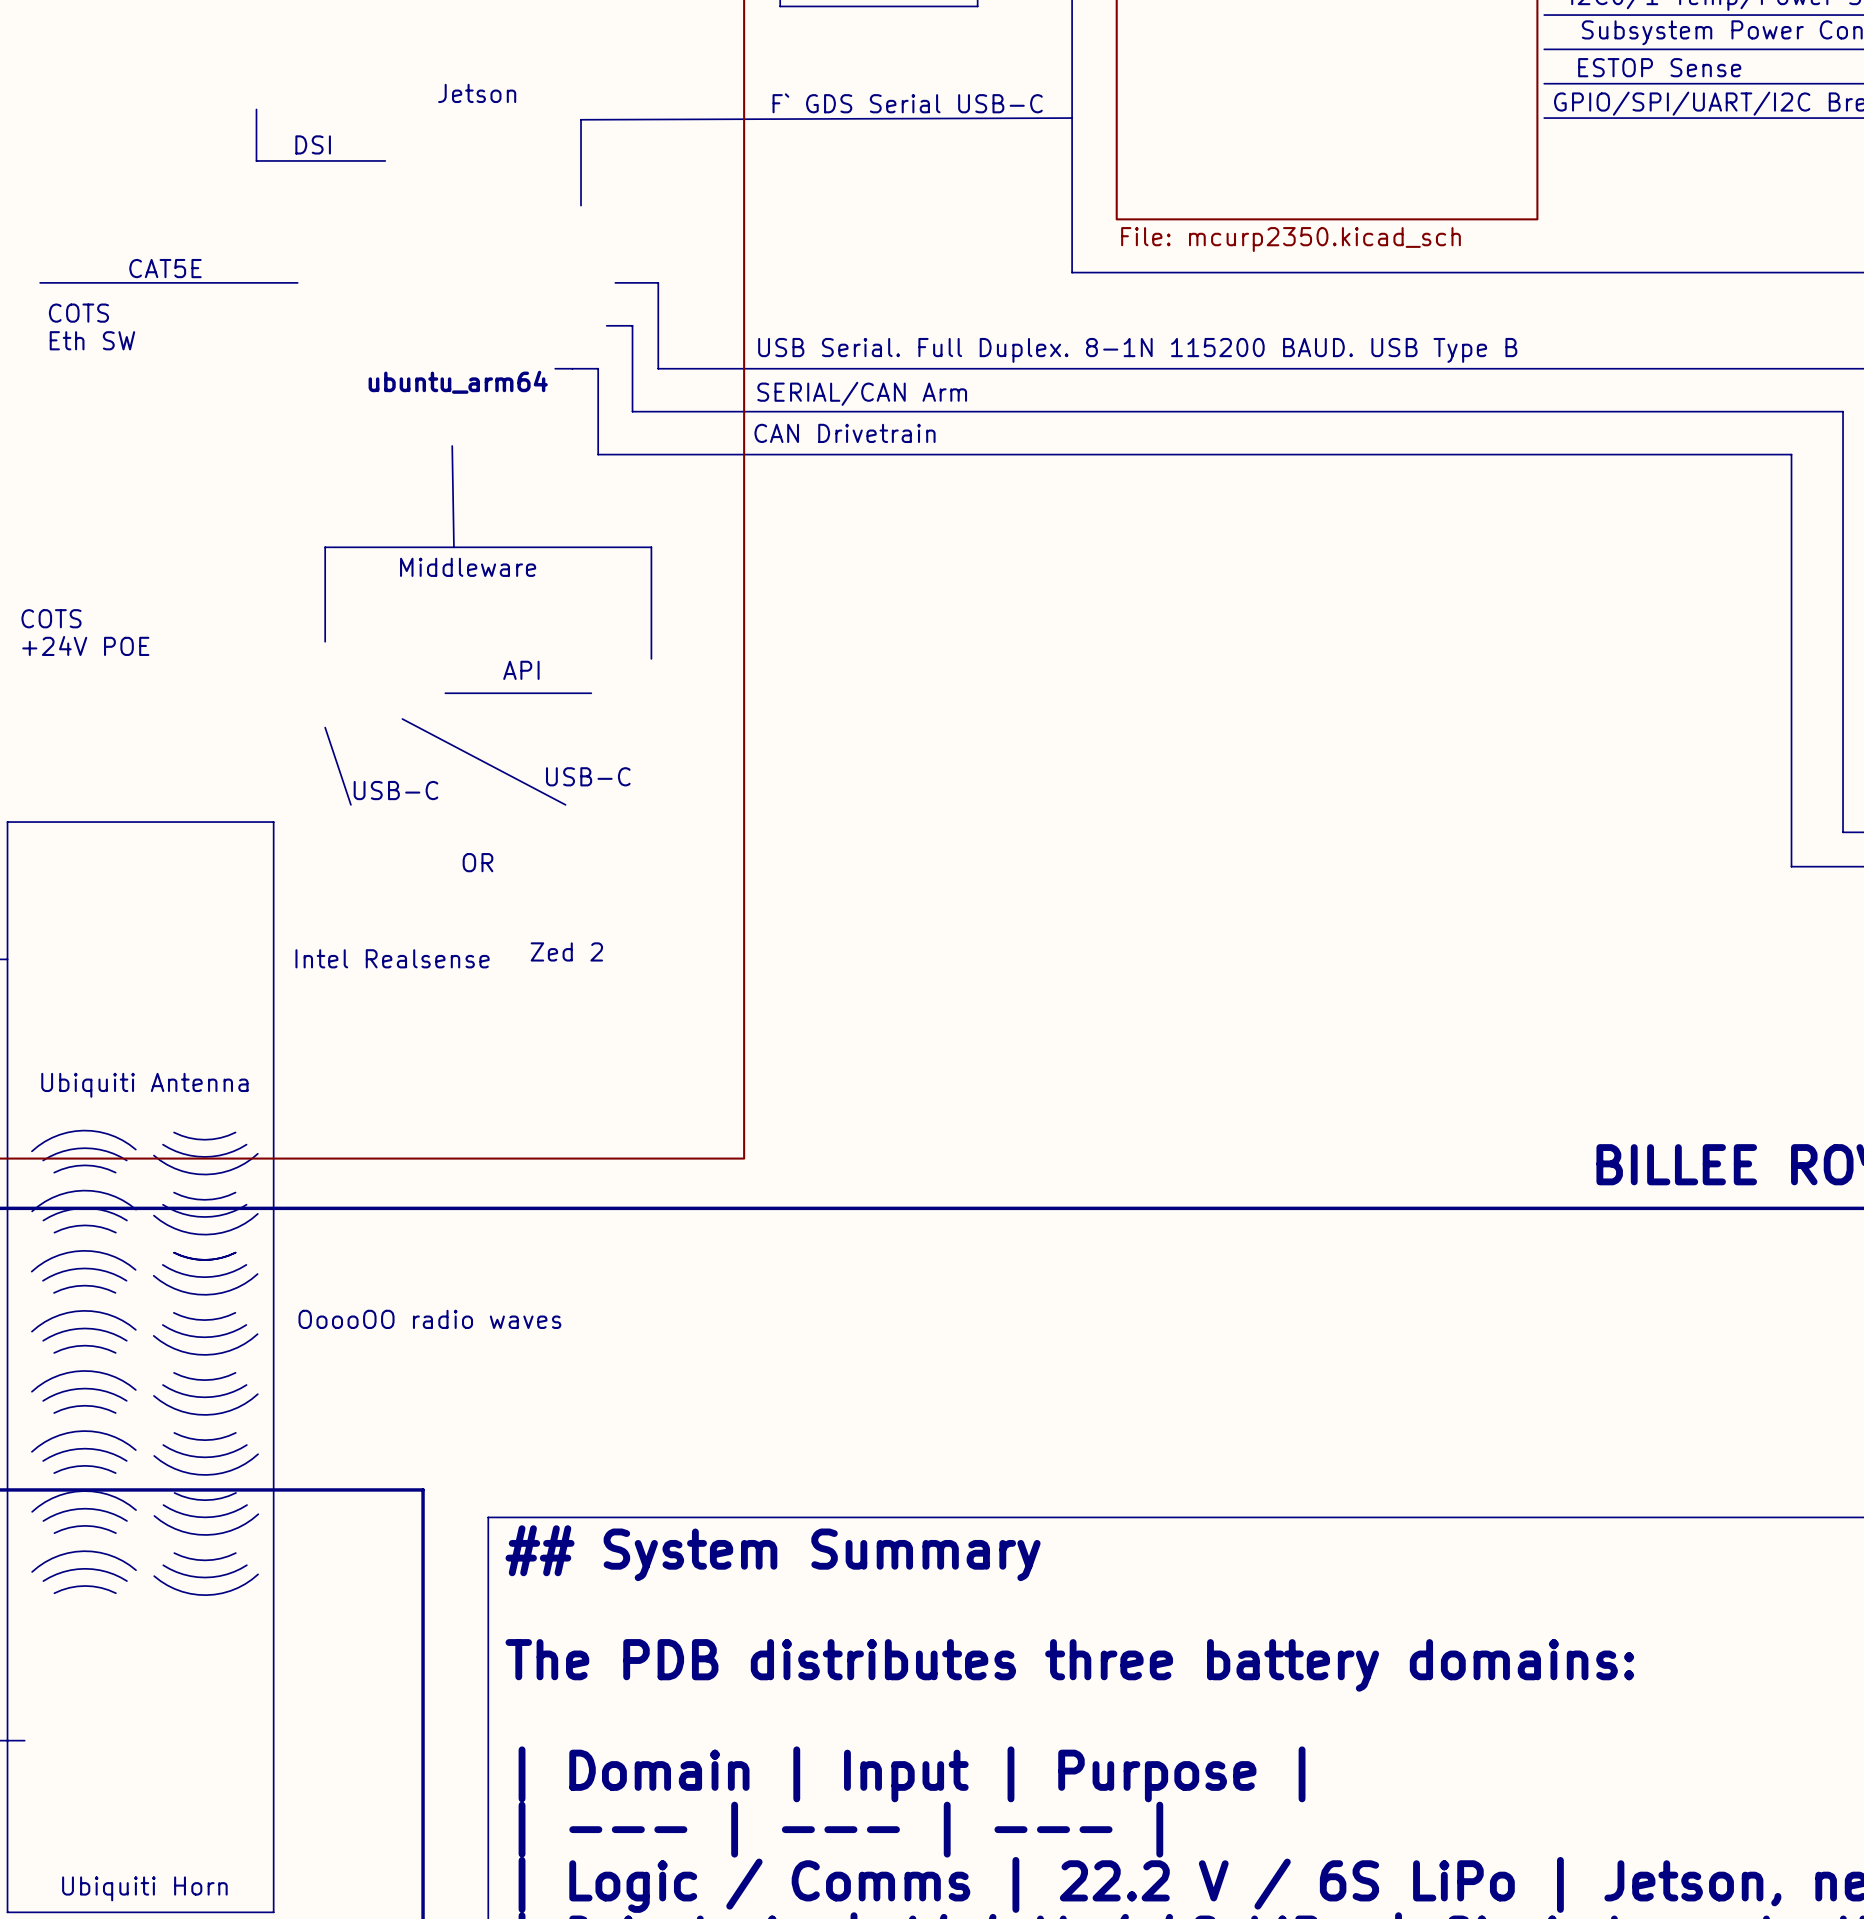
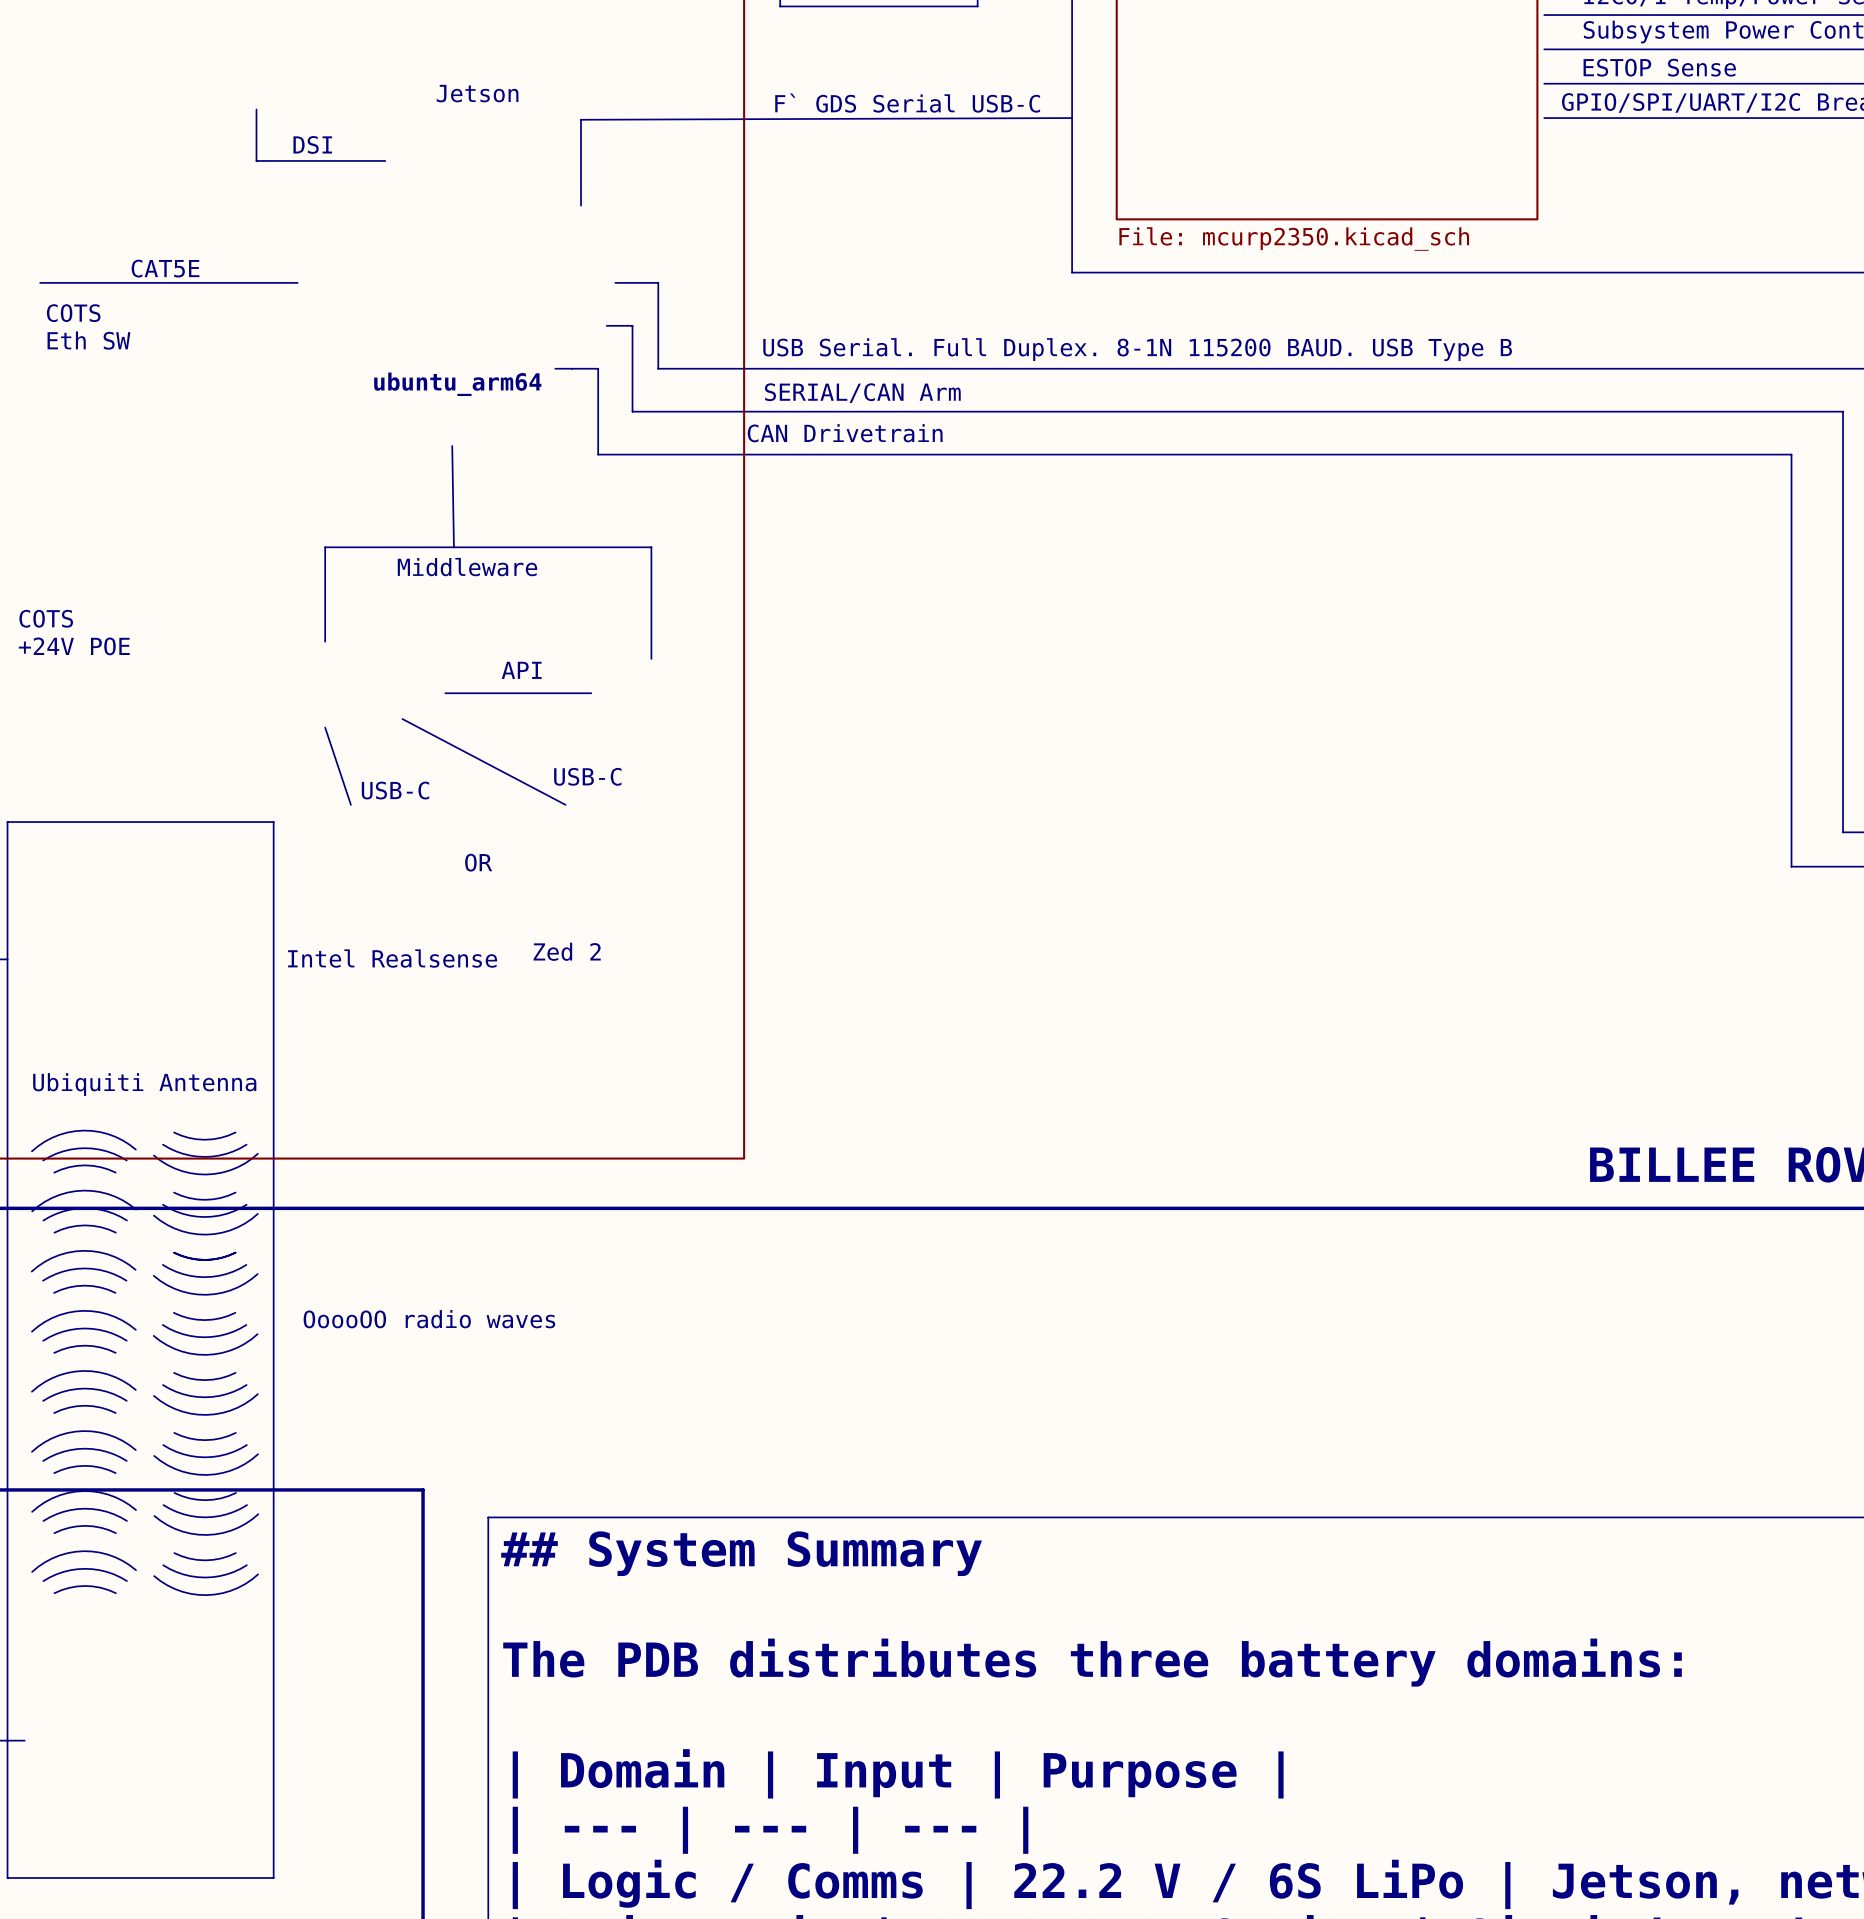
line: (7, 1878) (7, 1912) (273, 1912) (273, 1878) -> (7, 1878) (273, 1878)
text: Ubiquiti Horn (144, 1888) -> none

